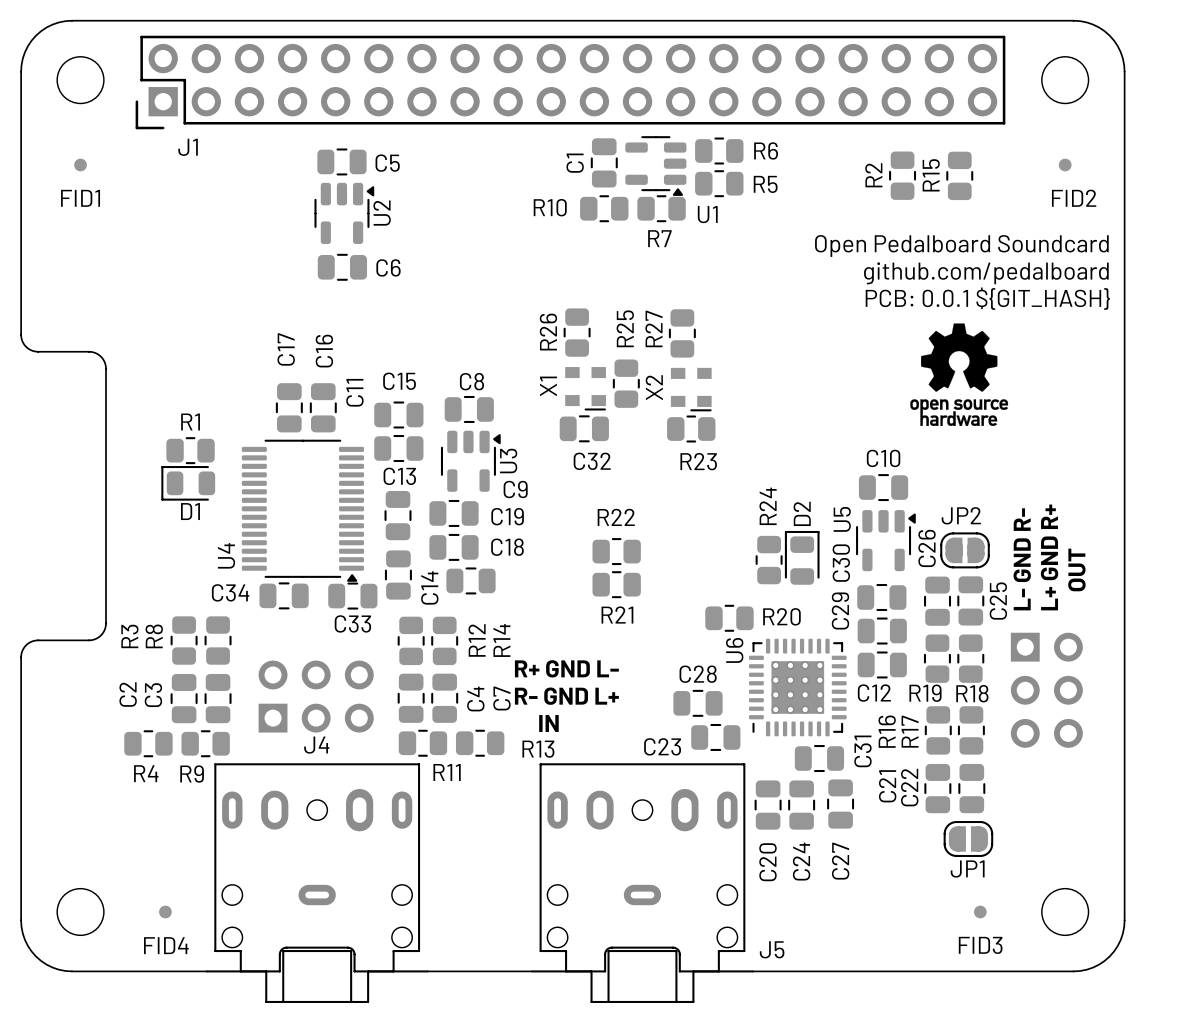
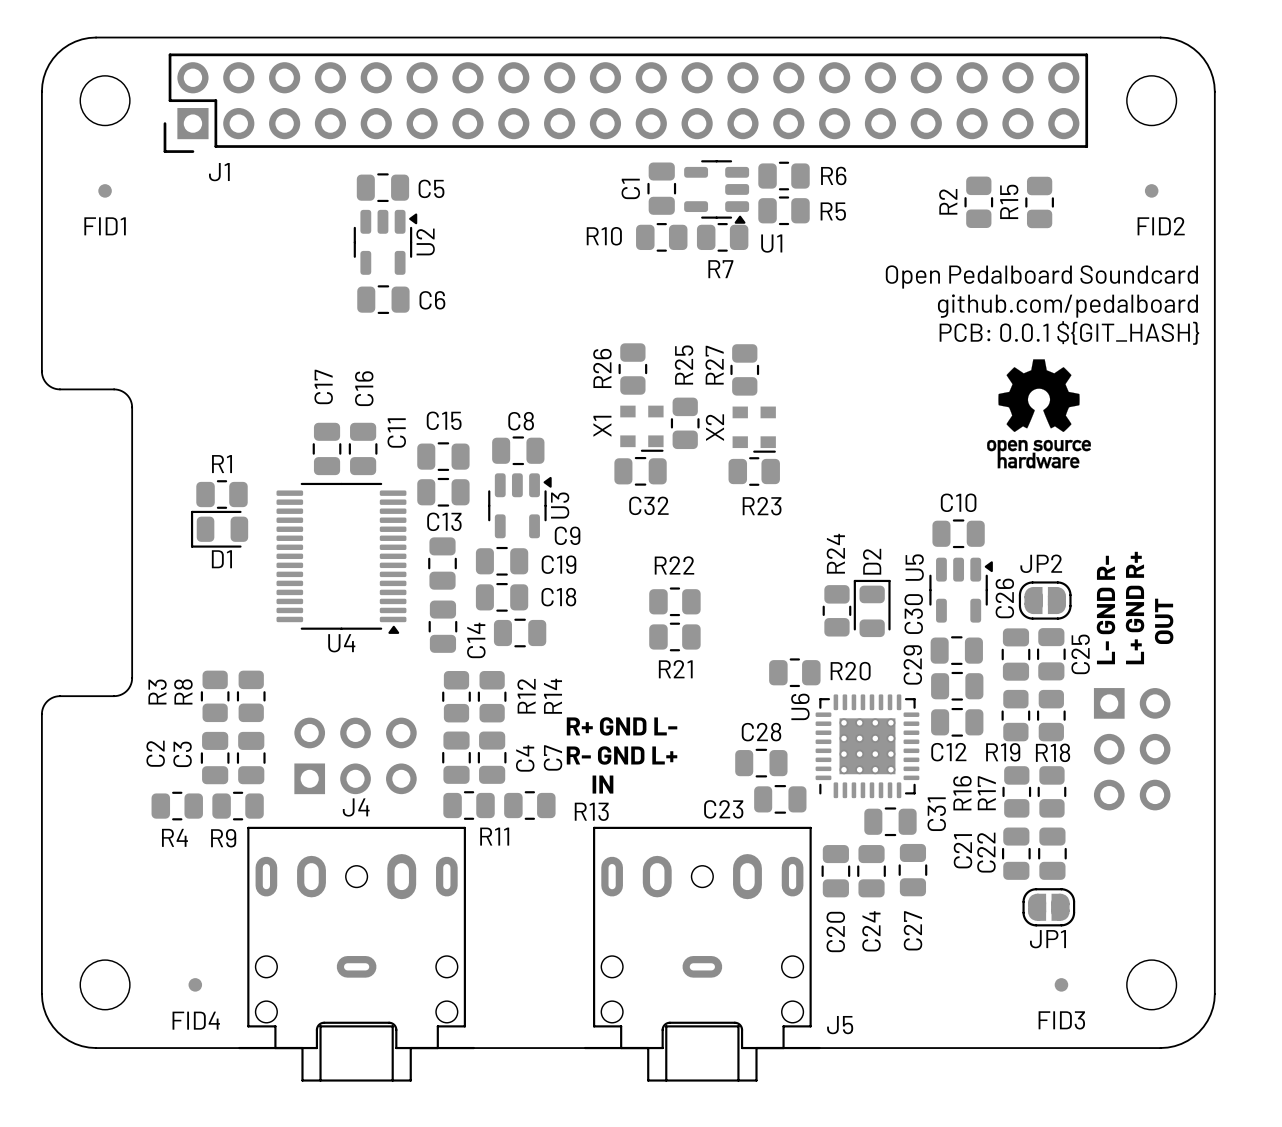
U4 name rotation: 0° (226, 555) -> 90° clockwise (341, 643)
U4 name position: U4 (226, 555) -> U4 (341, 643)
C34: (284, 595) -> none
C33: (352, 596) -> none

